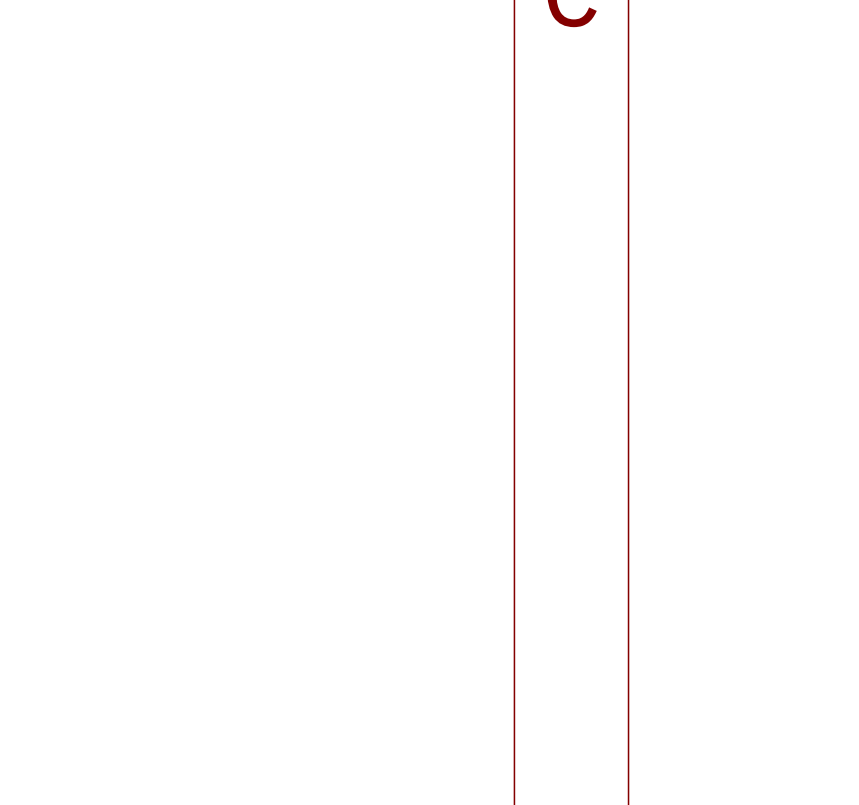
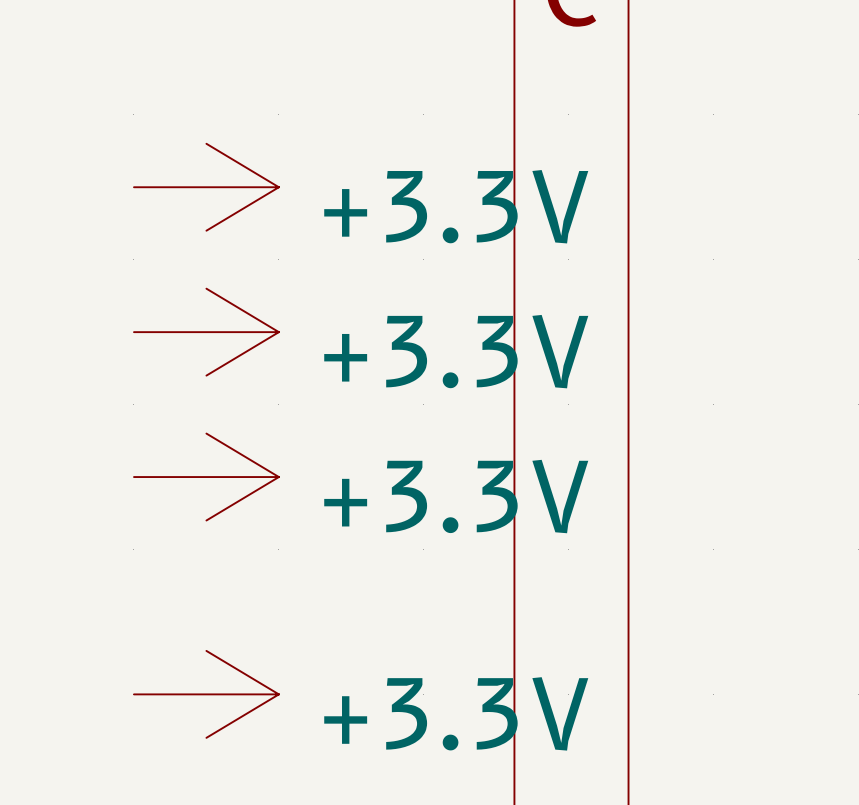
power symbol: none -> +3.3V (206, 187)
power symbol: none -> +3.3V (206, 332)
power symbol: none -> +3.3V (206, 477)
power symbol: none -> +3.3V (206, 694)

